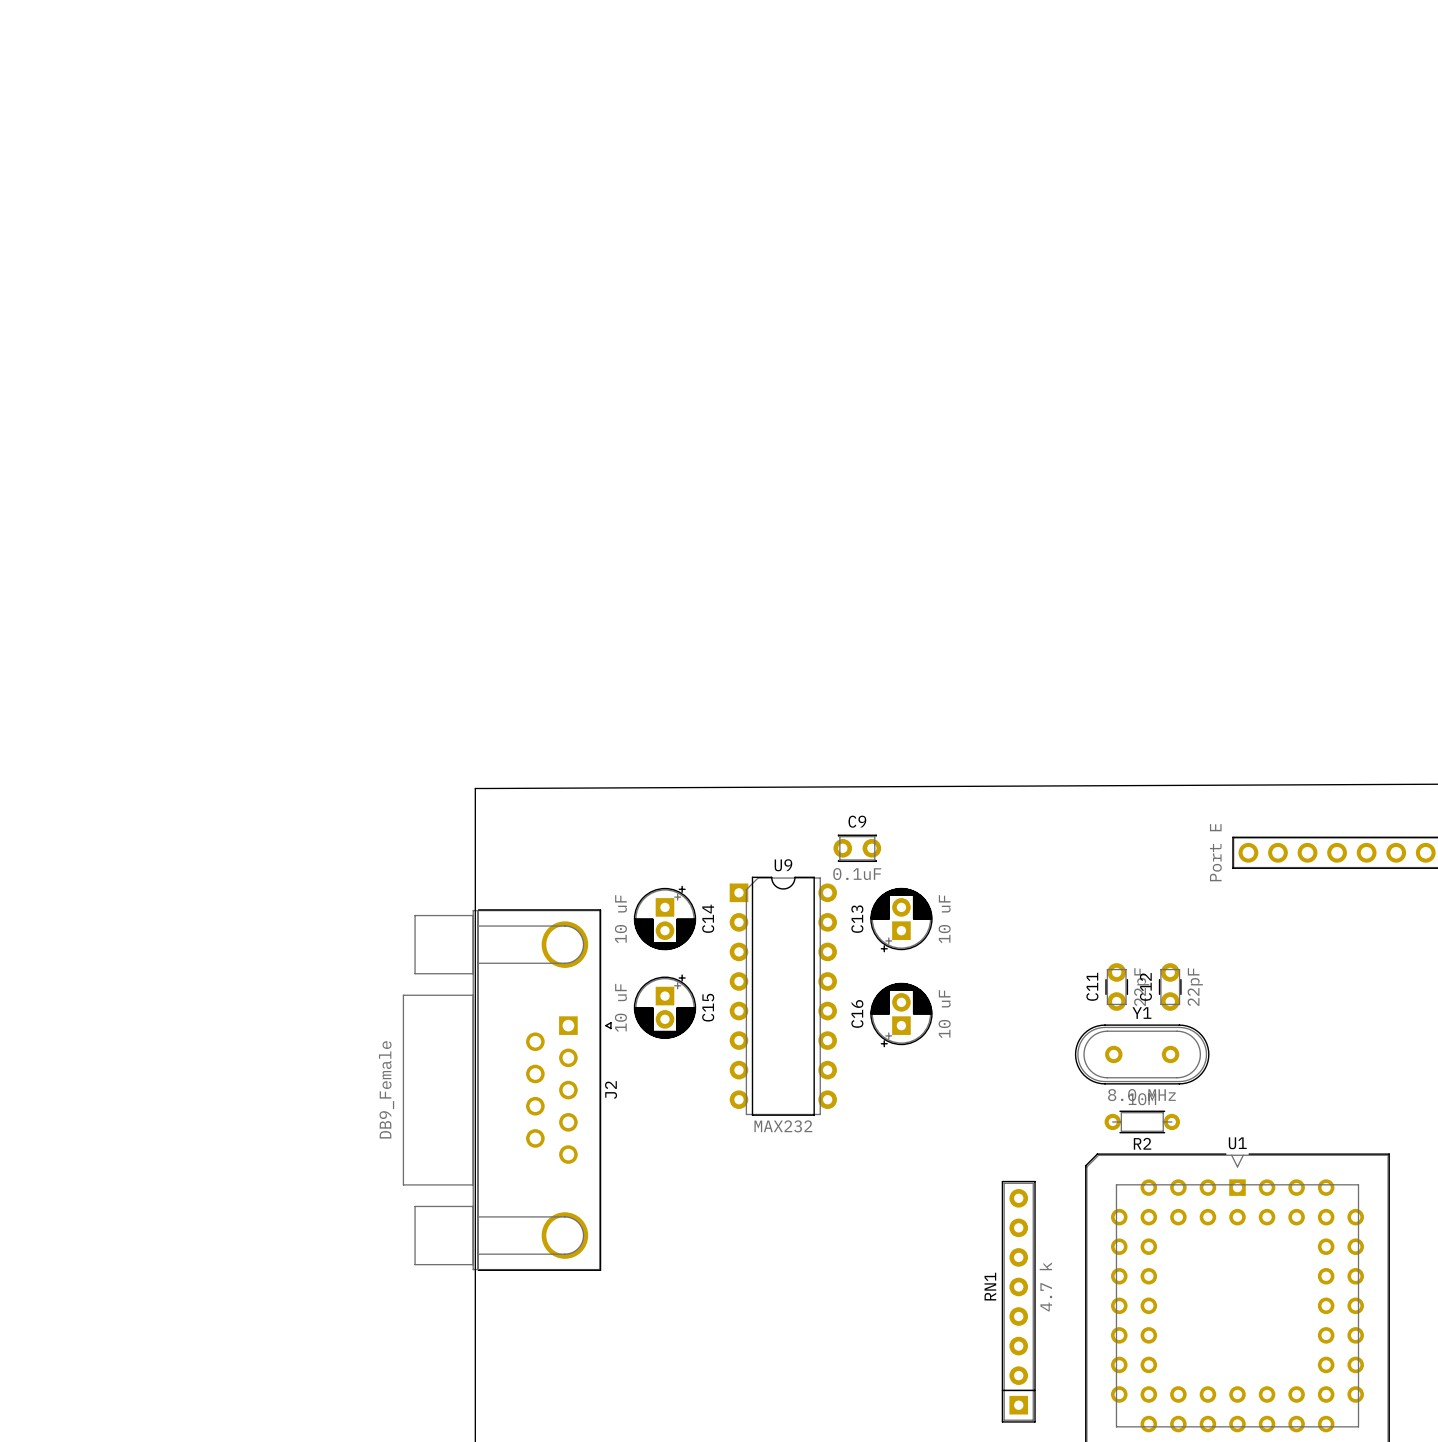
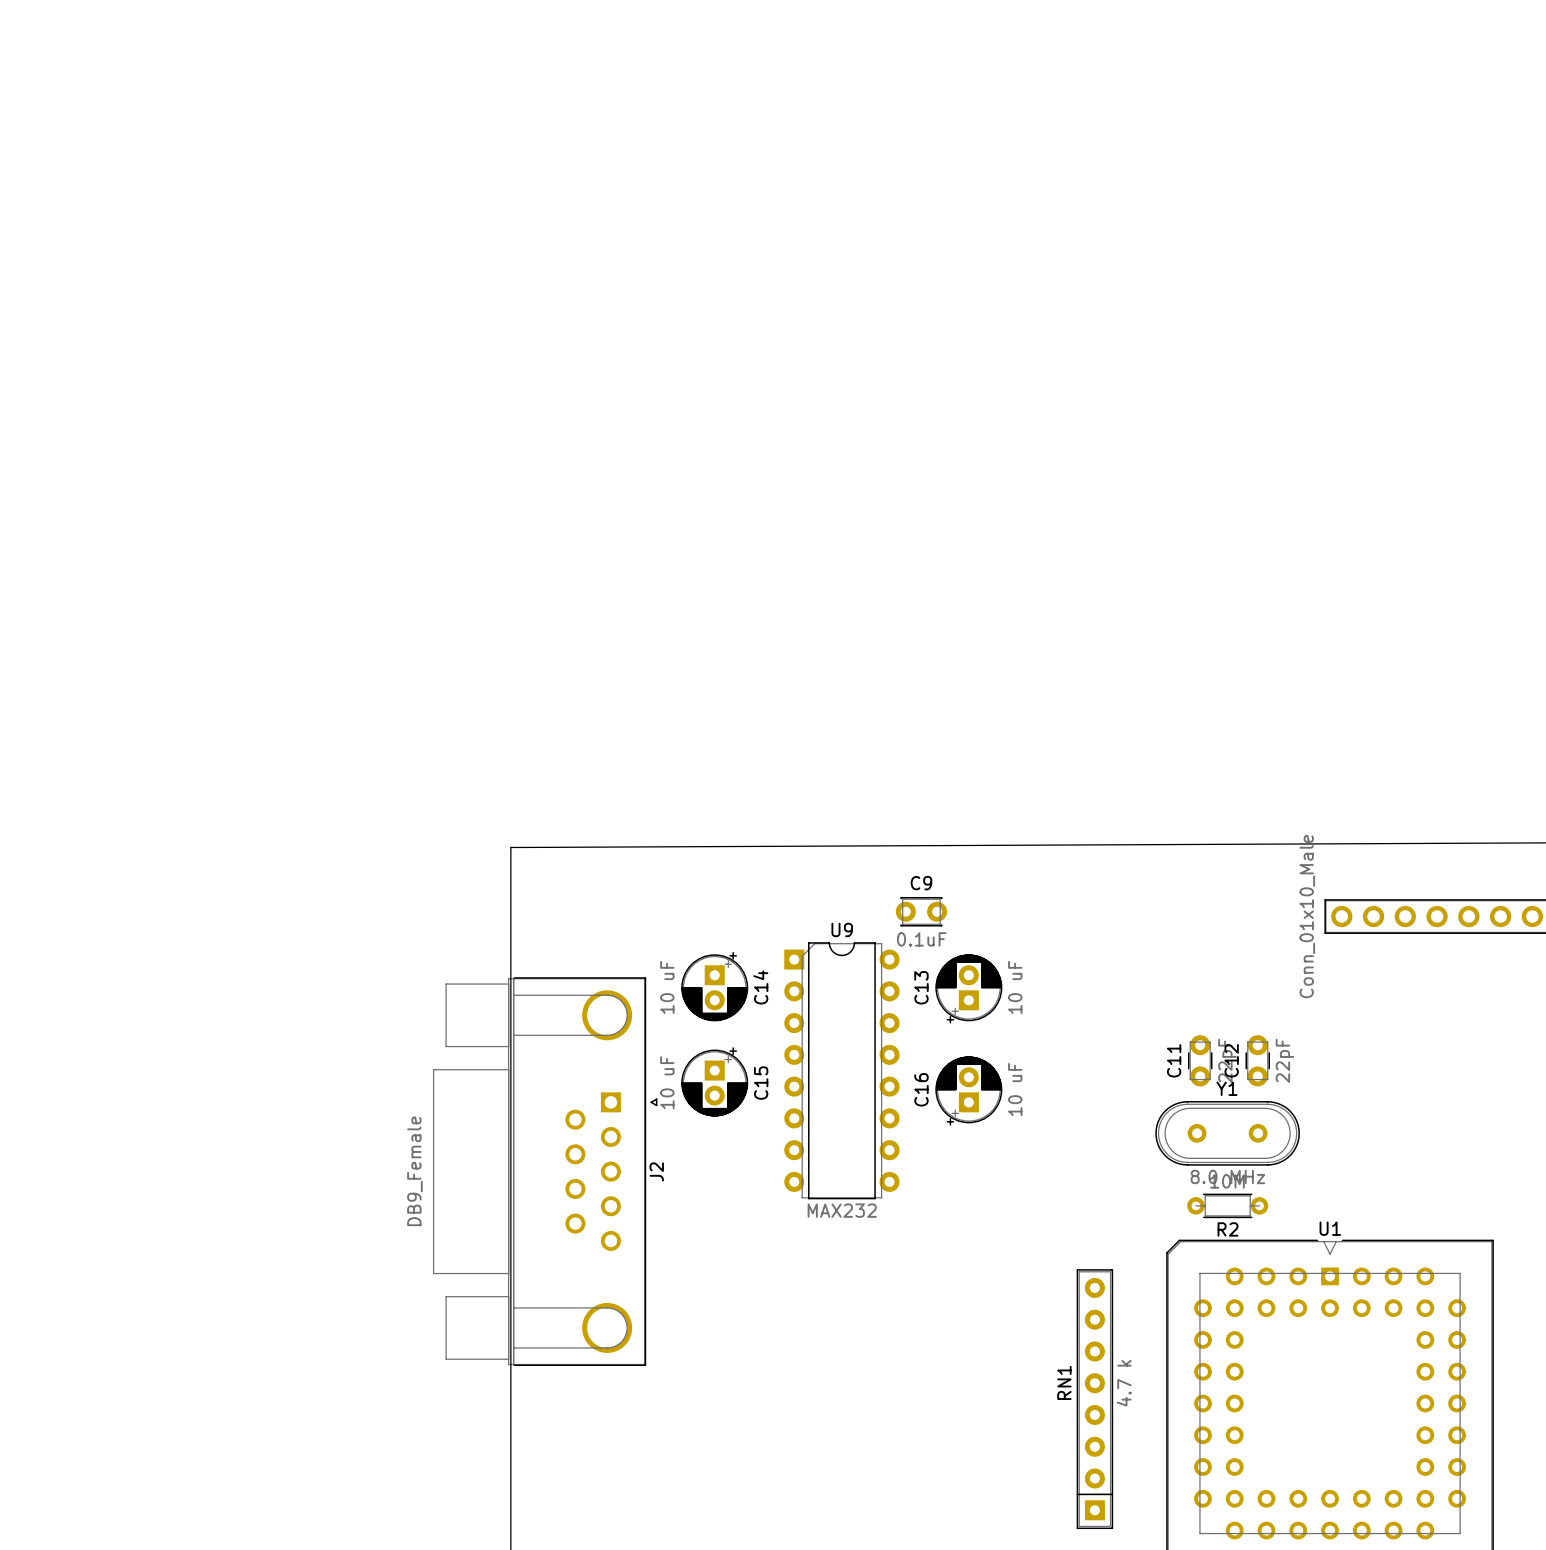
part value: Port E (1215, 852) -> Conn_01x10_Male (1307, 916)

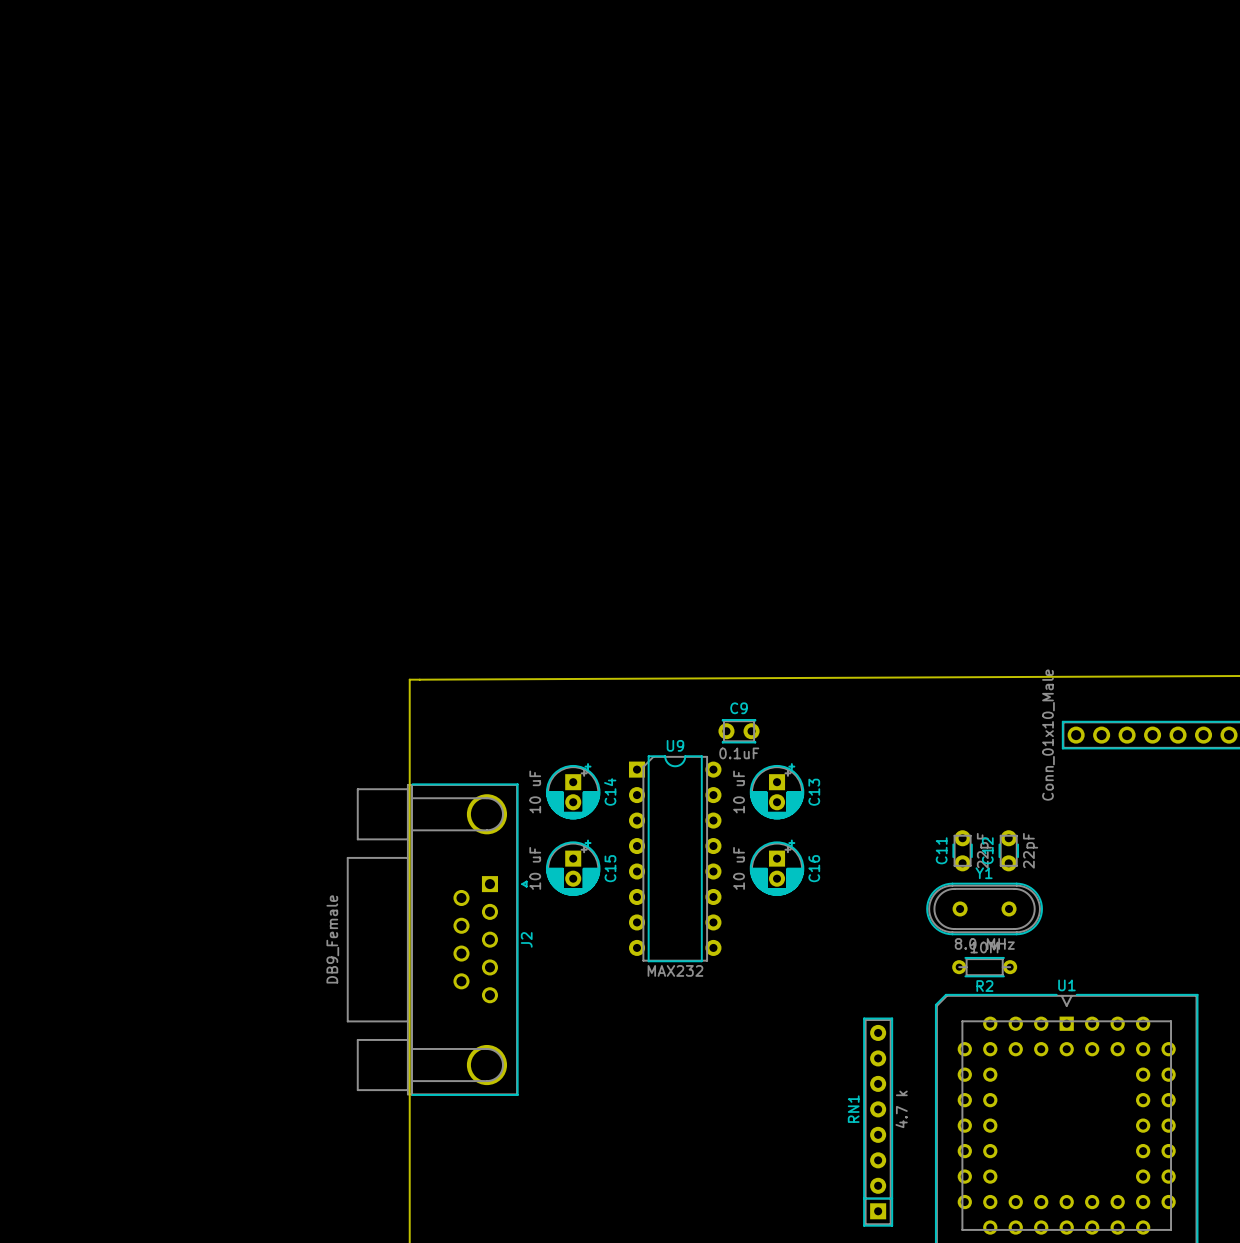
C13 rotation: 0° (968, 988) -> 180° (777, 791)
C16 rotation: 0° (968, 1090) -> 180° (777, 867)

